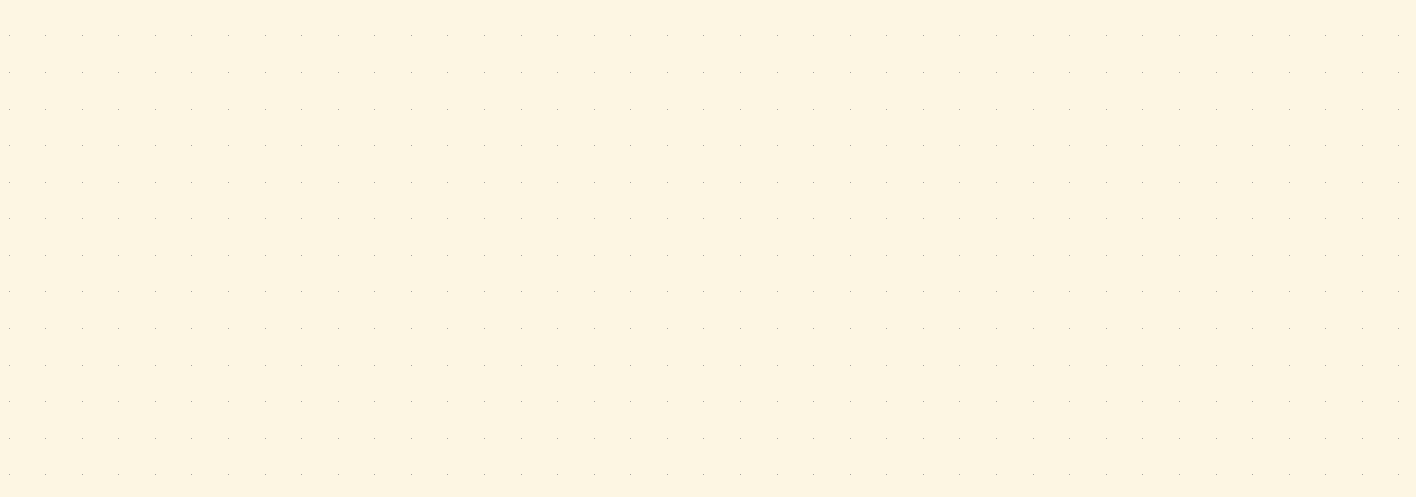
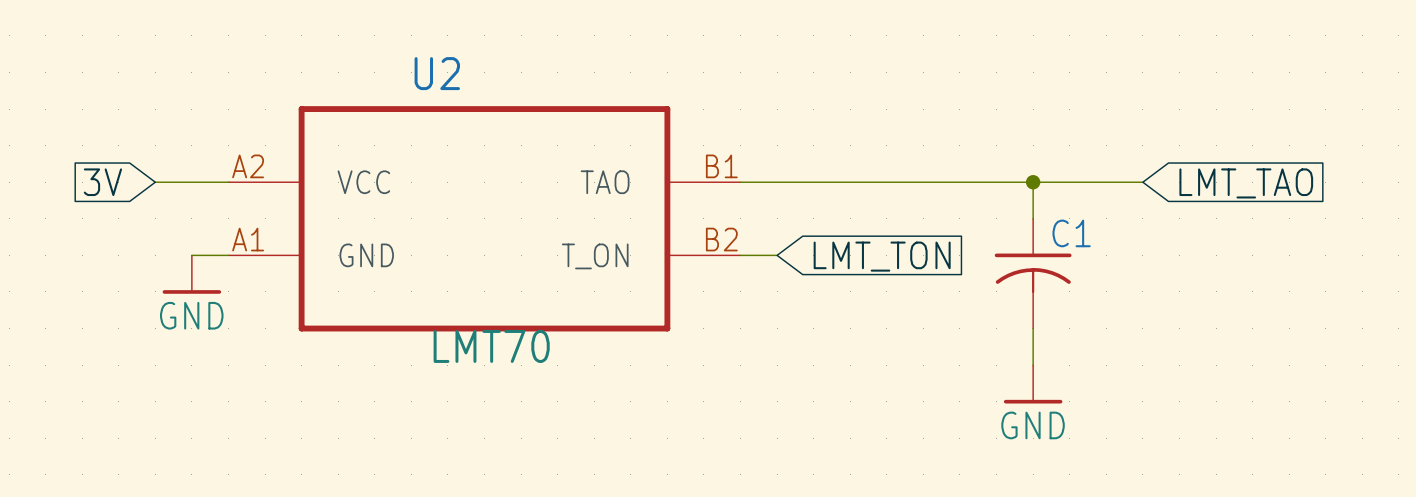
global label: none -> 3V (102, 182)
wire: none -> (155, 182) (228, 182)
wire: none -> (740, 182) (1142, 182)
wire: none -> (1033, 182) (1033, 218)
junction: none -> (1033, 182)
global label: none -> LMT_TAO (1246, 183)
U2: none -> (484, 218)
wire: none -> (191, 255) (228, 255)
wire: none -> (740, 255) (777, 255)
global label: none -> LMT_TON (882, 256)
C1: none -> (1033, 273)
power symbol: none -> GND (191, 274)
wire: none -> (1033, 328) (1033, 365)
power symbol: none -> GND (1033, 384)

